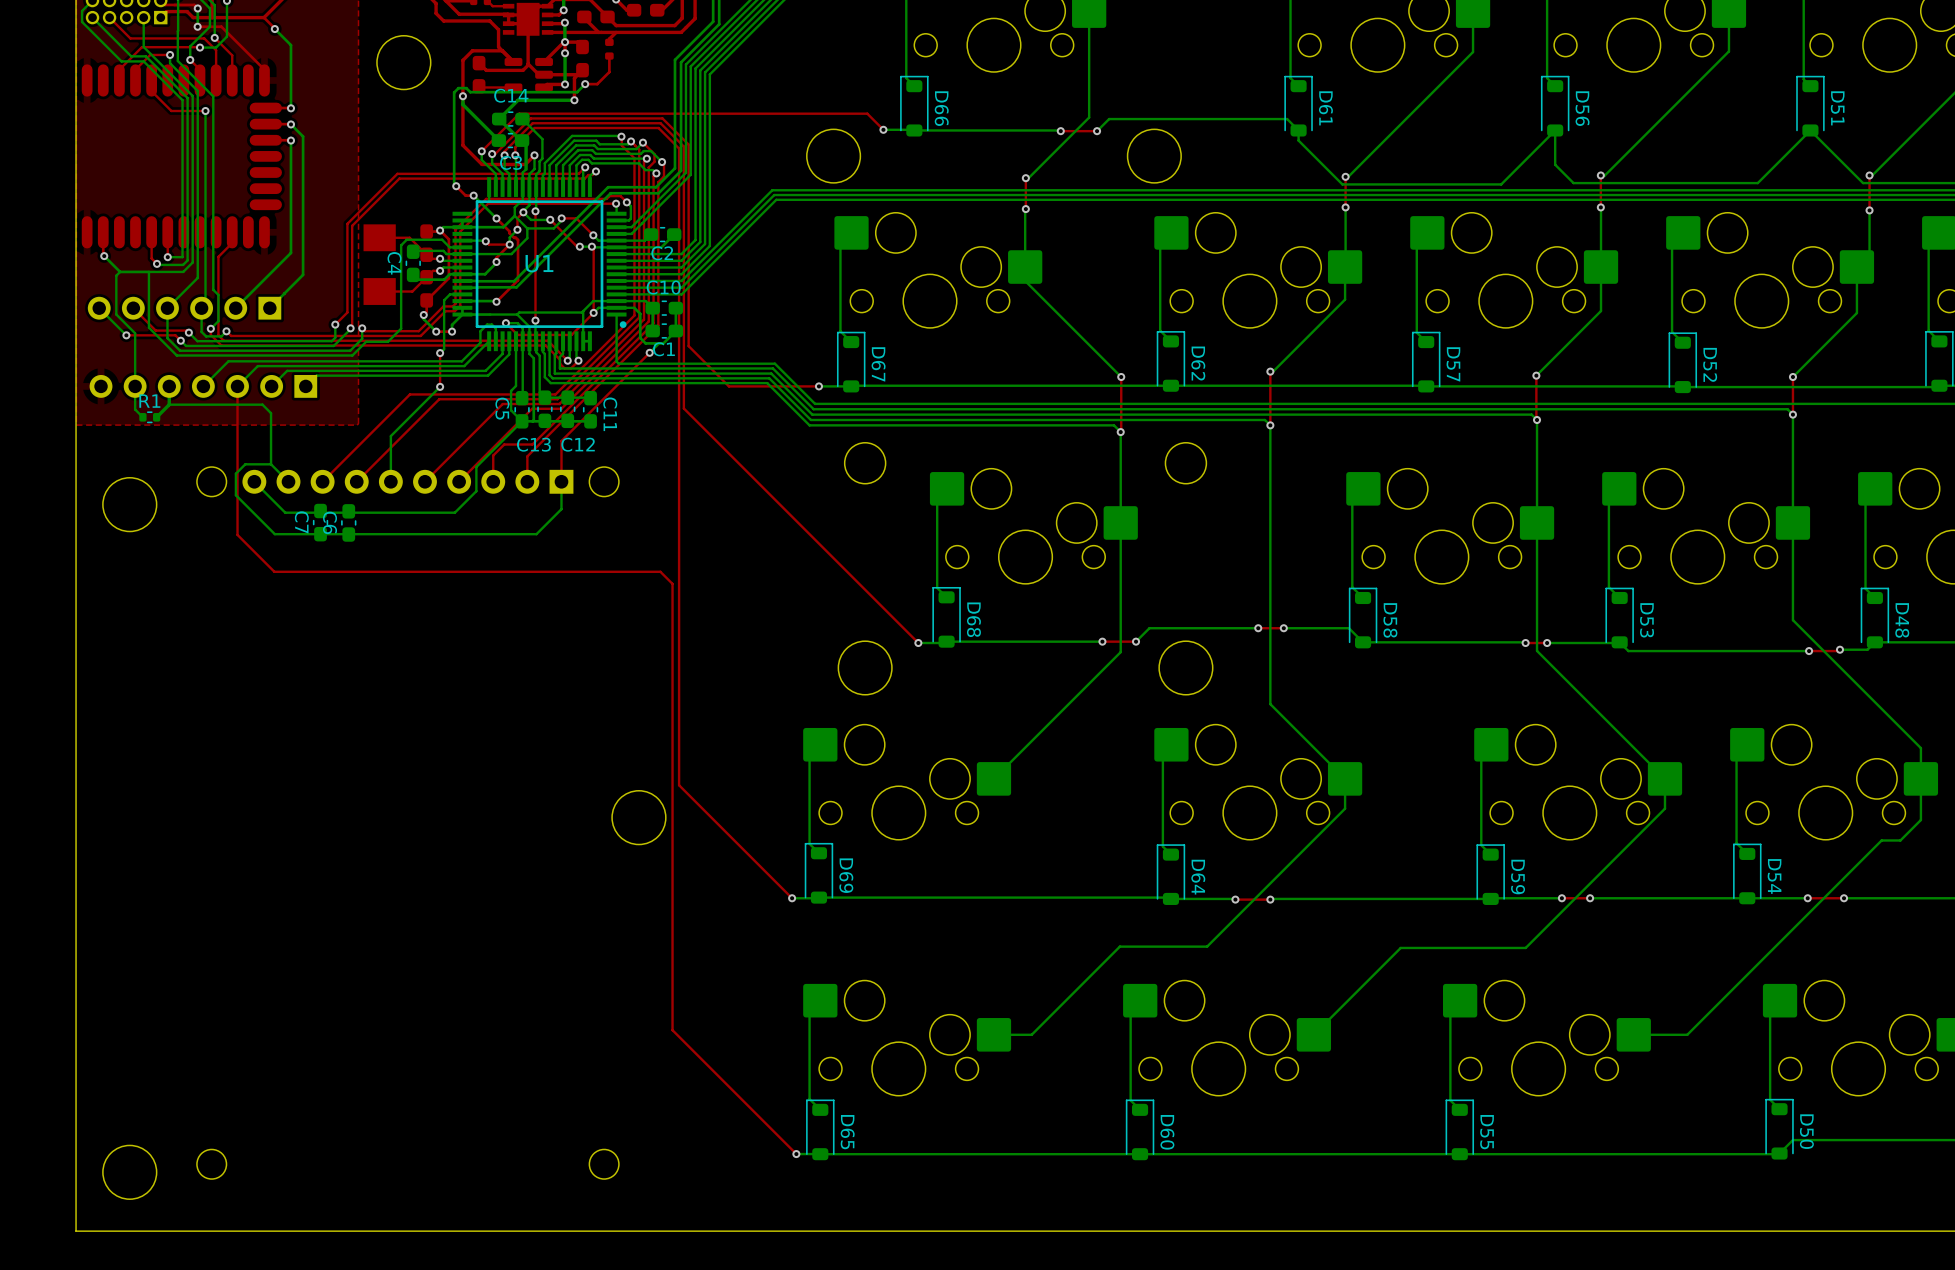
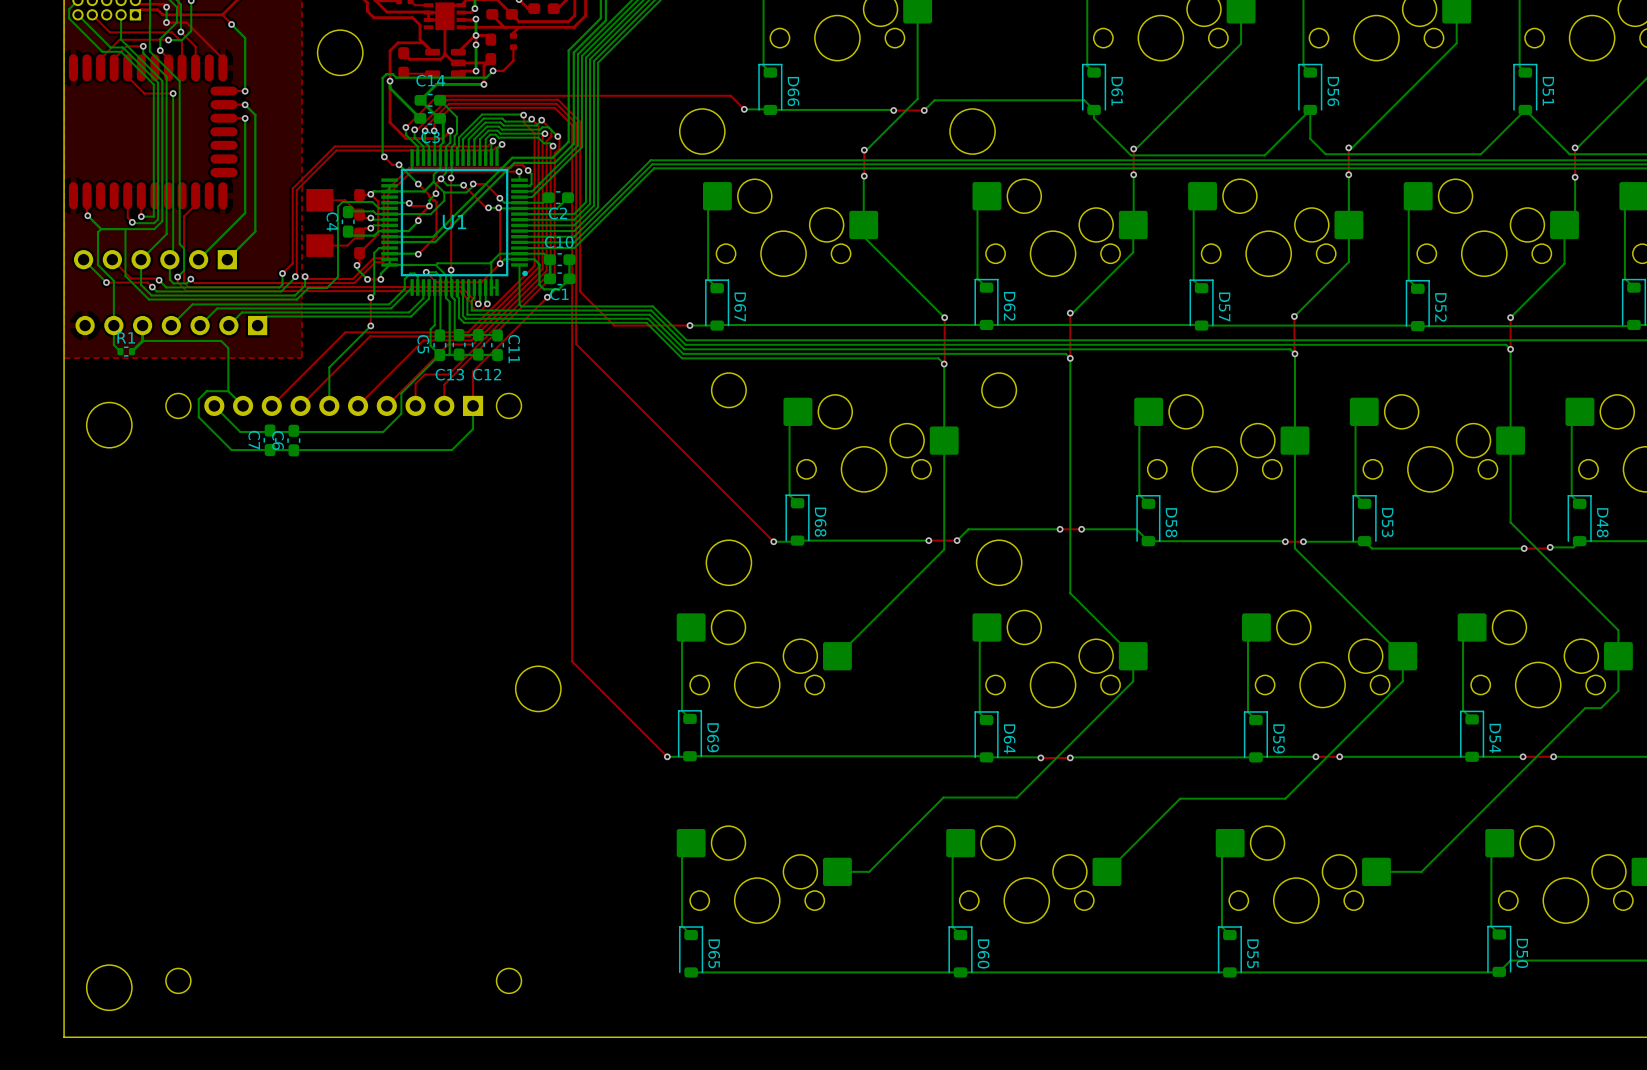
top track: (237, 386) (237, 534) (274, 571) (660, 571) (672, 583) (672, 1030) (796, 1154) -> none
via: (796, 1154) -> none
bottom track: (820, 1154) (796, 1154) -> none

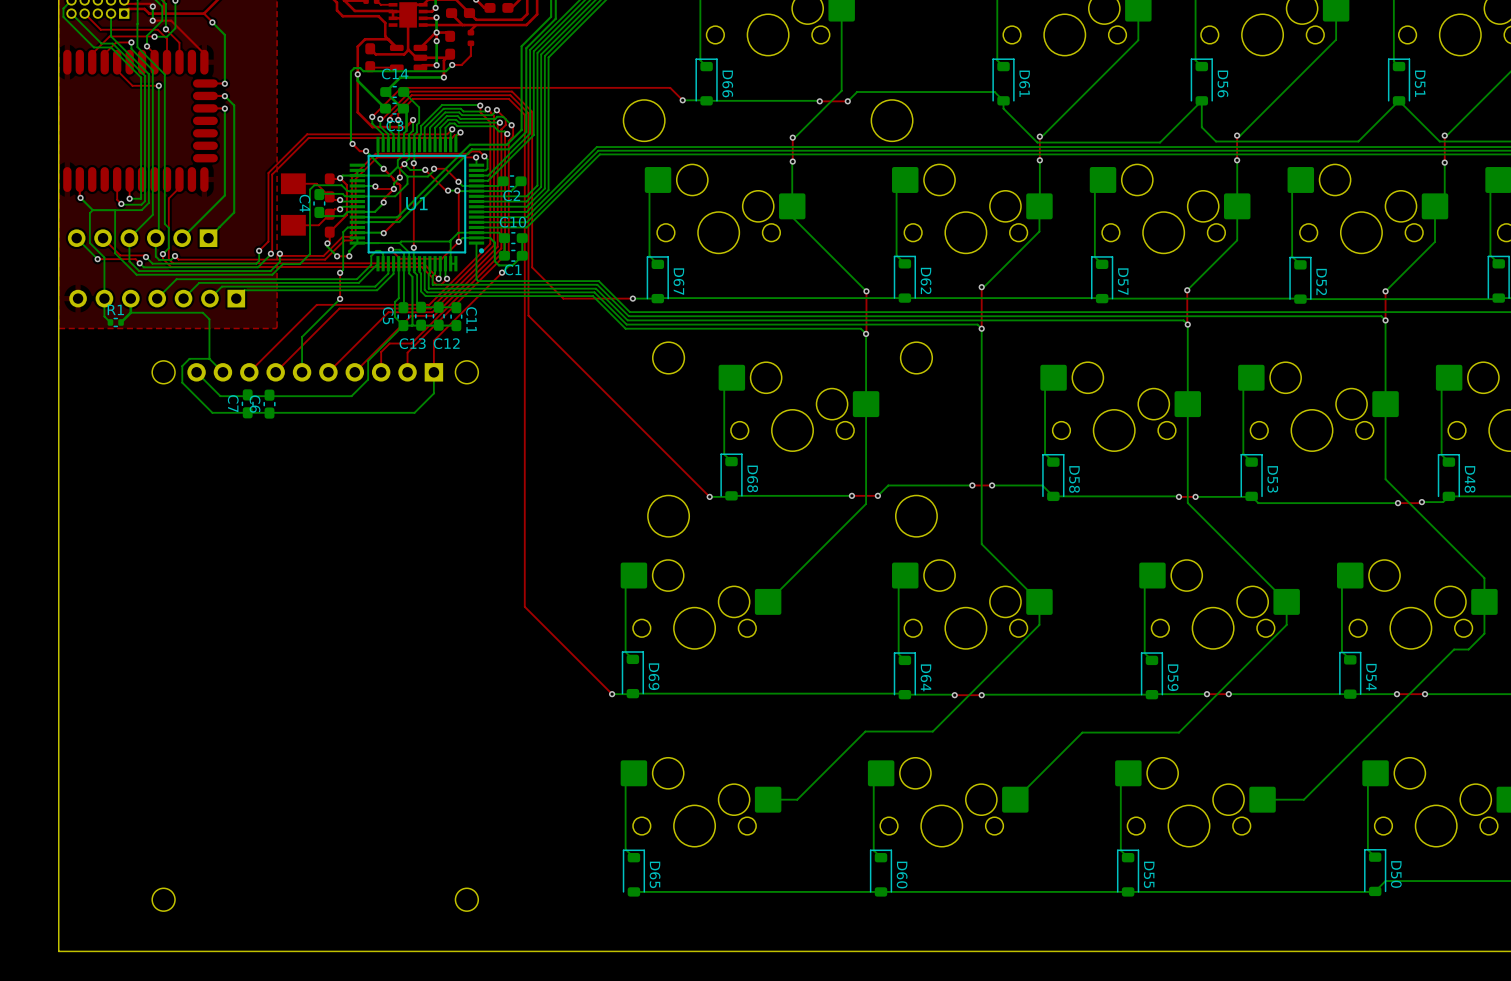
round board edge: [317, 29, 364, 76] -> none
round board edge: [86, 401, 133, 449] -> none
round board edge: [515, 665, 562, 713] -> none
round board edge: [86, 964, 133, 1011] -> none

